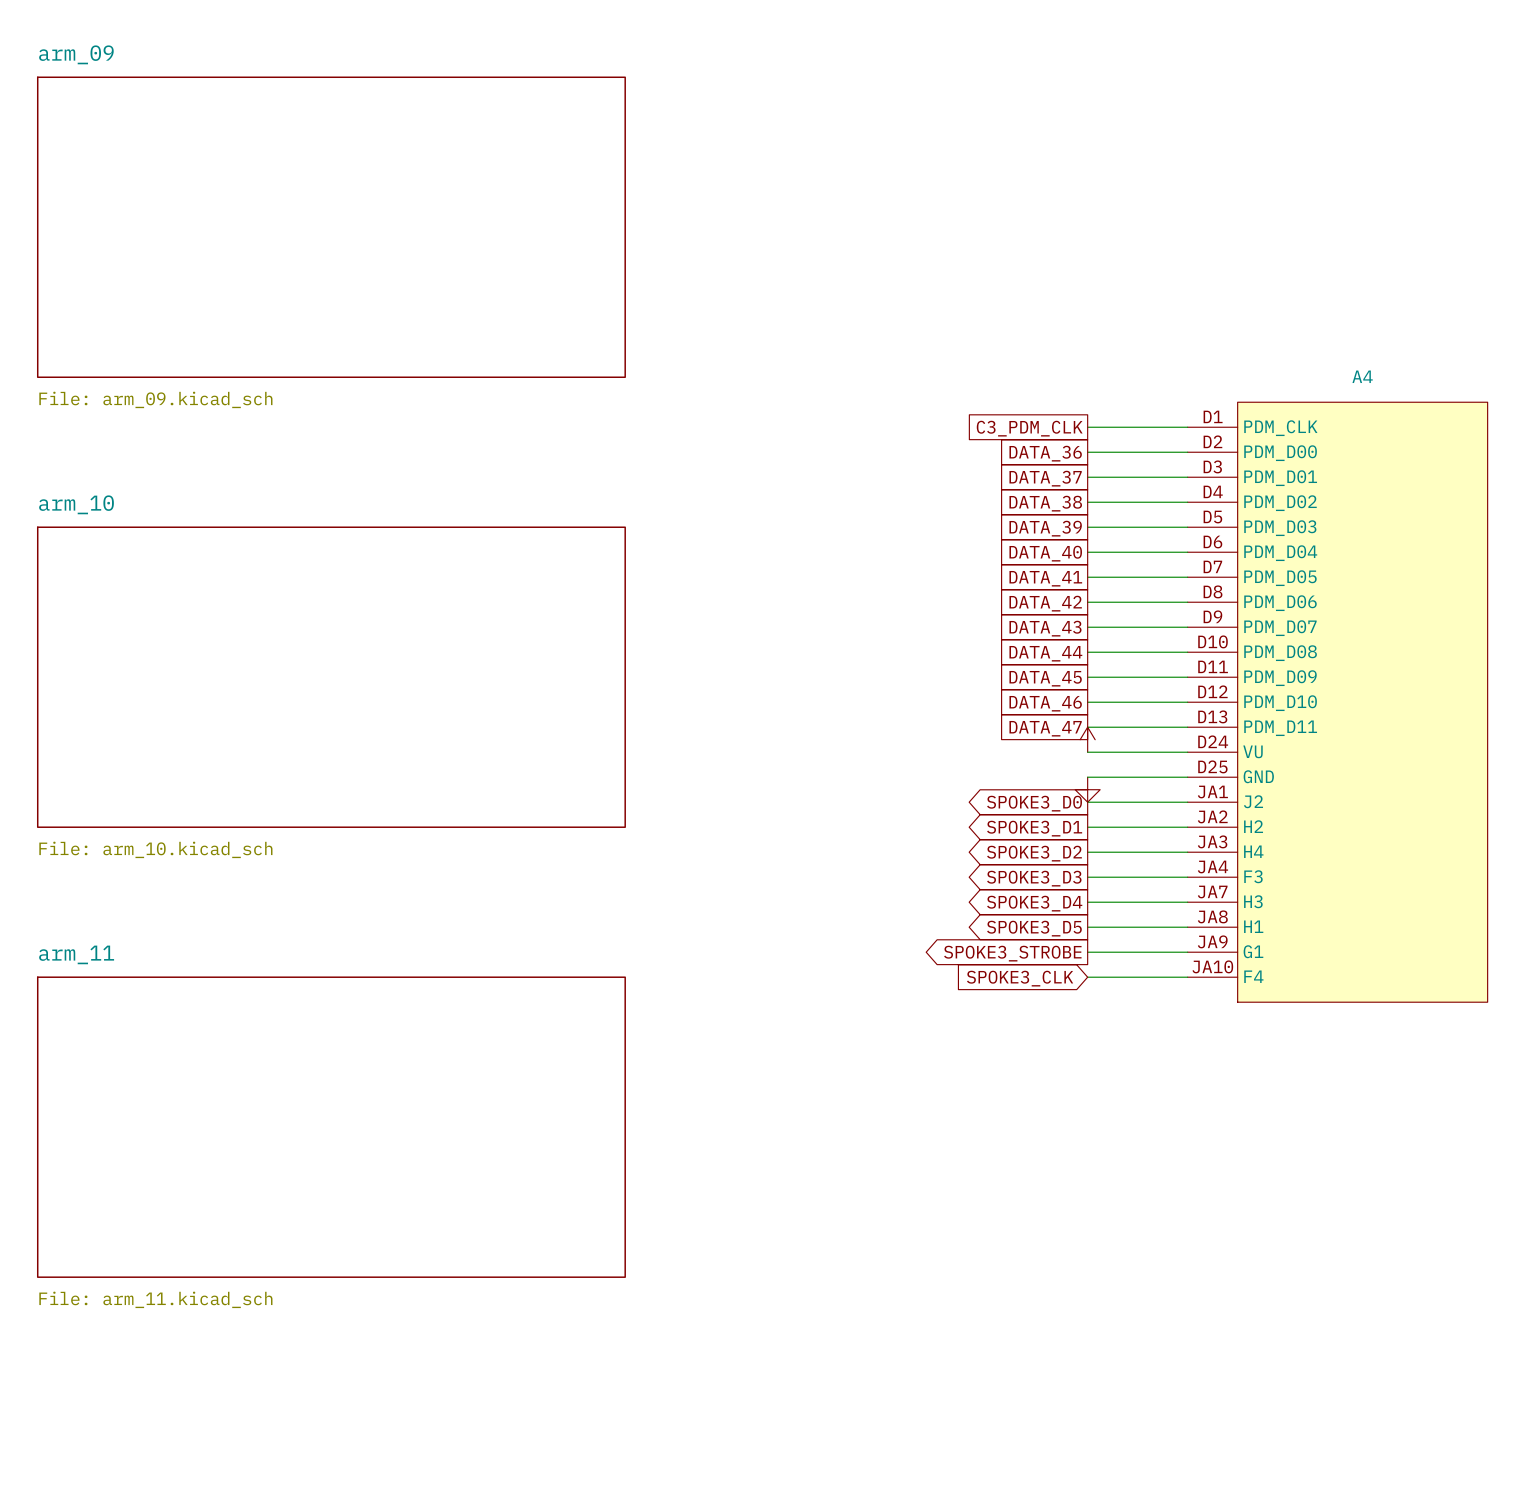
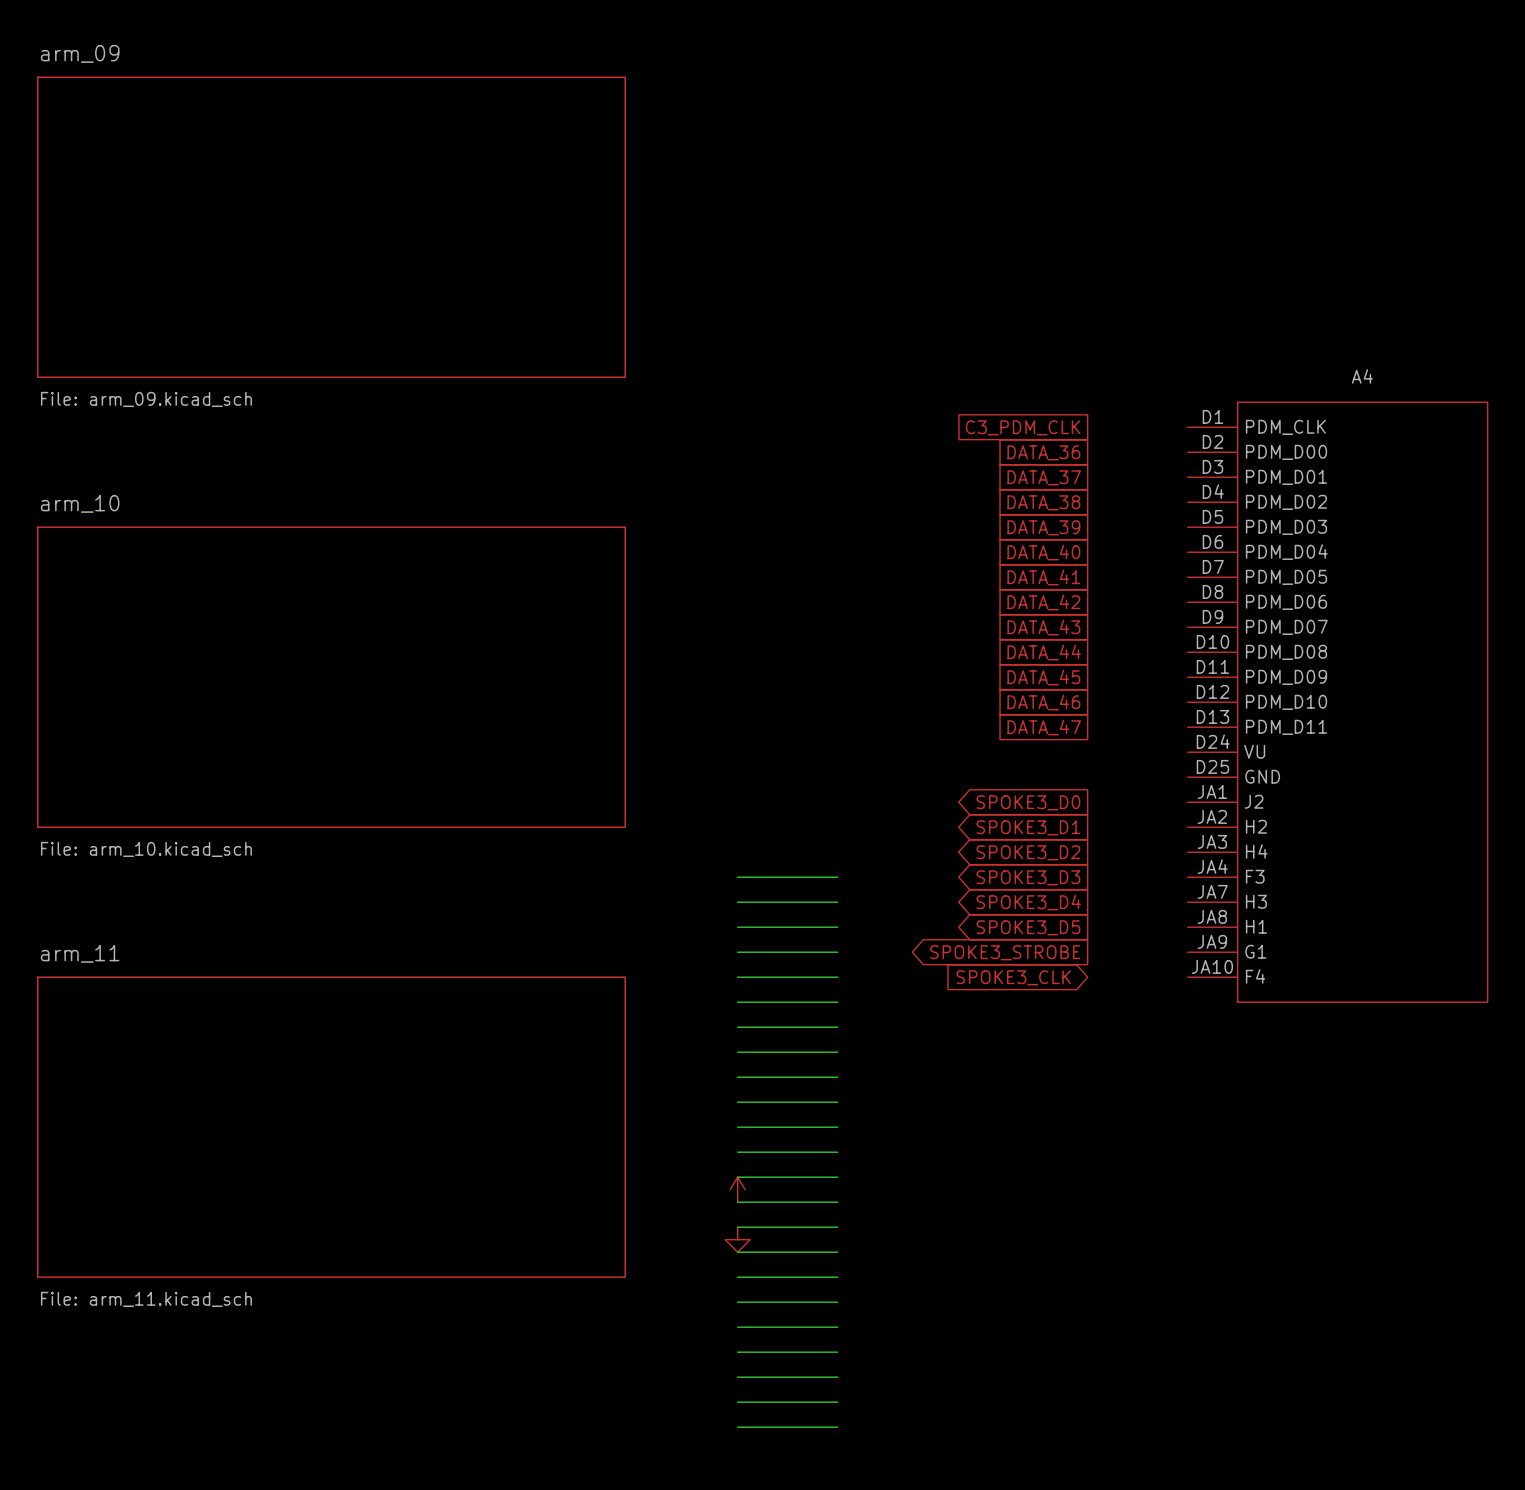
wire: (1087, 427) (1187, 427) -> none
wire: (1087, 452) (1187, 452) -> none
wire: (1087, 477) (1187, 477) -> none
wire: (1087, 502) (1187, 502) -> none
wire: (1087, 527) (1187, 527) -> none
wire: (1087, 552) (1187, 552) -> none
wire: (1087, 577) (1187, 577) -> none
wire: (1087, 602) (1187, 602) -> none
wire: (1087, 627) (1187, 627) -> none
wire: (1087, 652) (1187, 652) -> none
wire: (1087, 677) (1187, 677) -> none
wire: (1087, 702) (1187, 702) -> none
wire: (1087, 727) (1187, 727) -> none
power symbol: (1087, 739) -> none
wire: (1087, 752) (1187, 752) -> none
wire: (1087, 777) (1187, 777) -> none
power symbol: (1087, 789) -> none
wire: (1087, 802) (1187, 802) -> none
wire: (1087, 827) (1187, 827) -> none
wire: (1087, 852) (1187, 852) -> none
wire: none -> (737, 877) (837, 877)
wire: (1087, 877) (1187, 877) -> none
wire: none -> (737, 902) (837, 902)
wire: (1087, 902) (1187, 902) -> none
wire: none -> (737, 927) (837, 927)
wire: (1087, 927) (1187, 927) -> none
wire: none -> (737, 952) (837, 952)
wire: (1087, 952) (1187, 952) -> none
wire: none -> (737, 977) (837, 977)
wire: (1087, 977) (1187, 977) -> none
wire: none -> (737, 1002) (837, 1002)
wire: none -> (737, 1027) (837, 1027)
wire: none -> (737, 1052) (837, 1052)
wire: none -> (737, 1077) (837, 1077)
wire: none -> (737, 1102) (837, 1102)
wire: none -> (737, 1127) (837, 1127)
wire: none -> (737, 1152) (837, 1152)
wire: none -> (737, 1177) (837, 1177)
power symbol: none -> (737, 1189)
wire: none -> (737, 1202) (837, 1202)
wire: none -> (737, 1227) (837, 1227)
power symbol: none -> (737, 1239)
wire: none -> (737, 1252) (837, 1252)
wire: none -> (737, 1277) (837, 1277)
wire: none -> (737, 1302) (837, 1302)
wire: none -> (737, 1327) (837, 1327)
wire: none -> (737, 1352) (837, 1352)
wire: none -> (737, 1377) (837, 1377)
wire: none -> (737, 1402) (837, 1402)
wire: none -> (737, 1427) (837, 1427)

